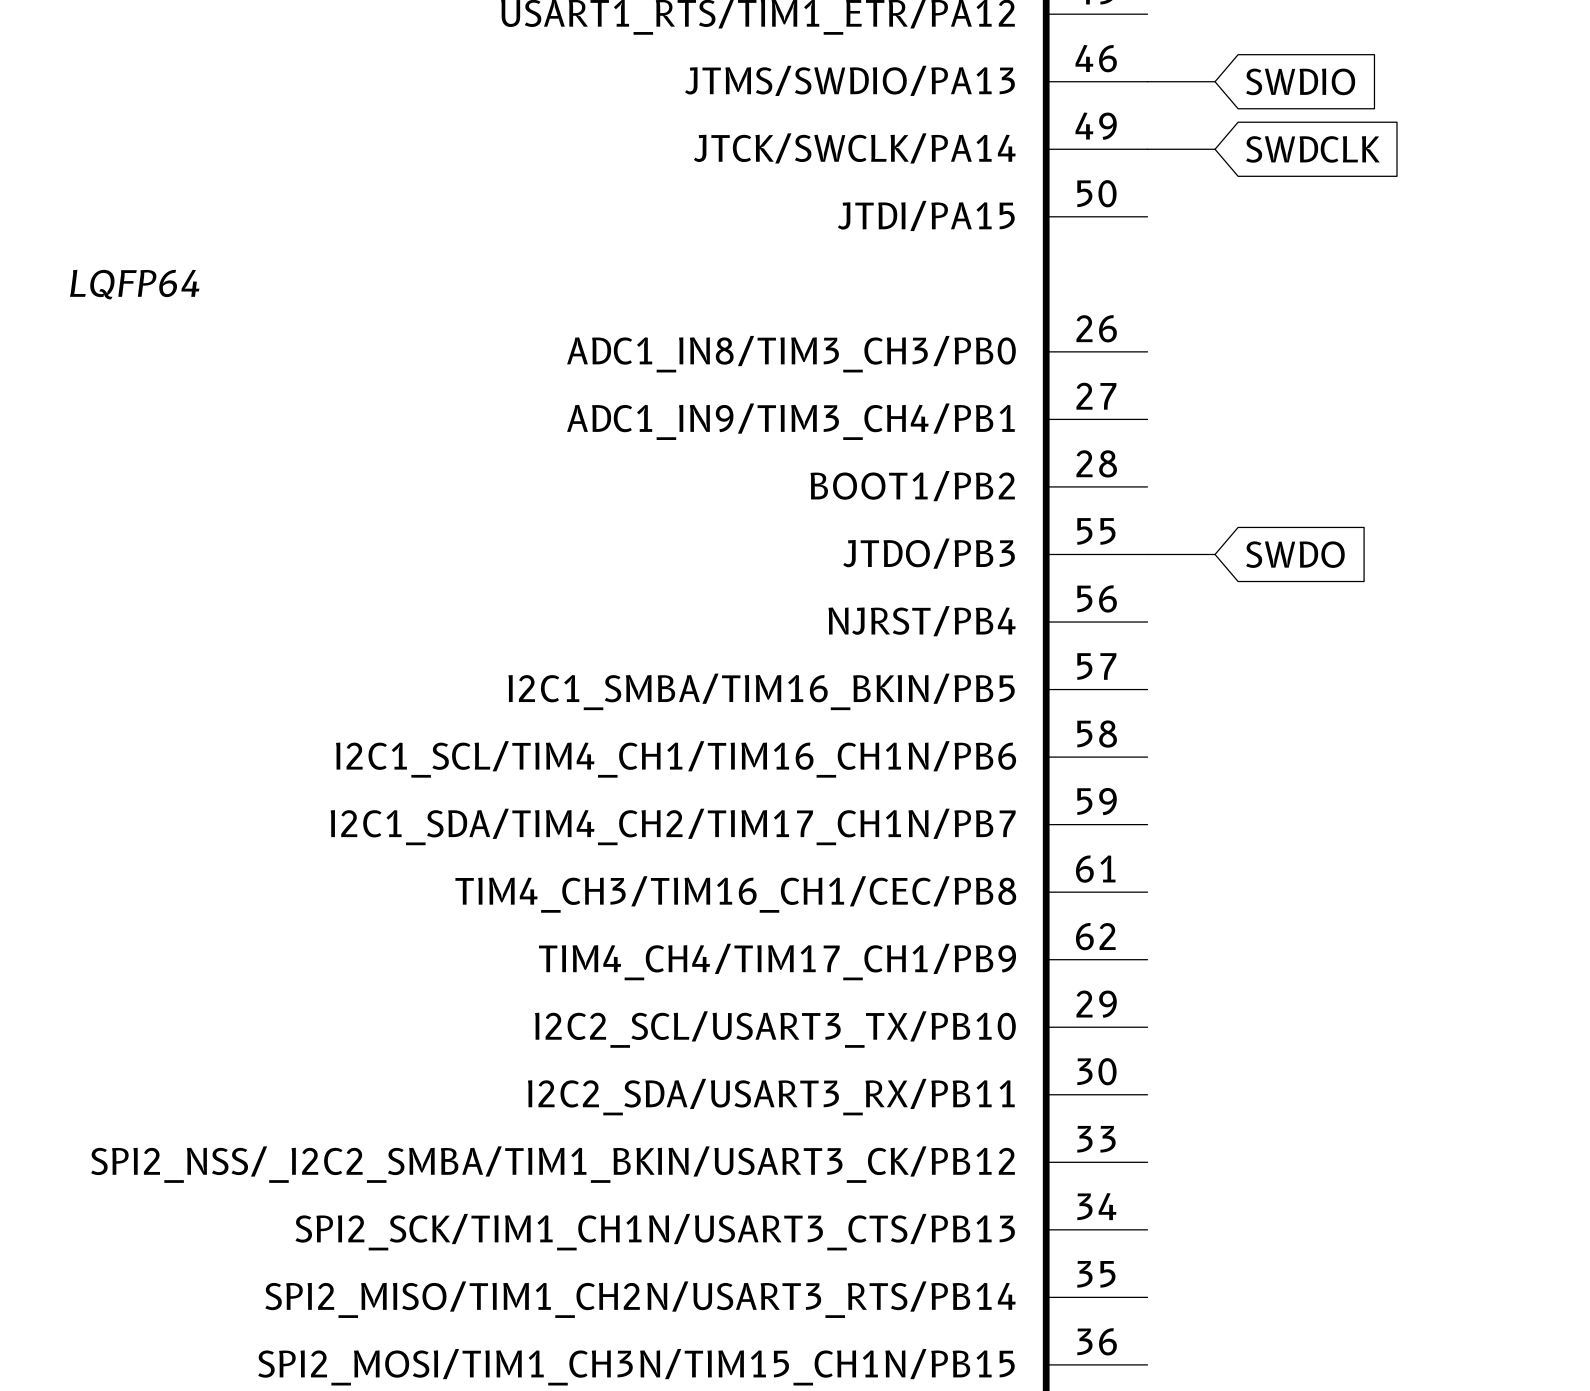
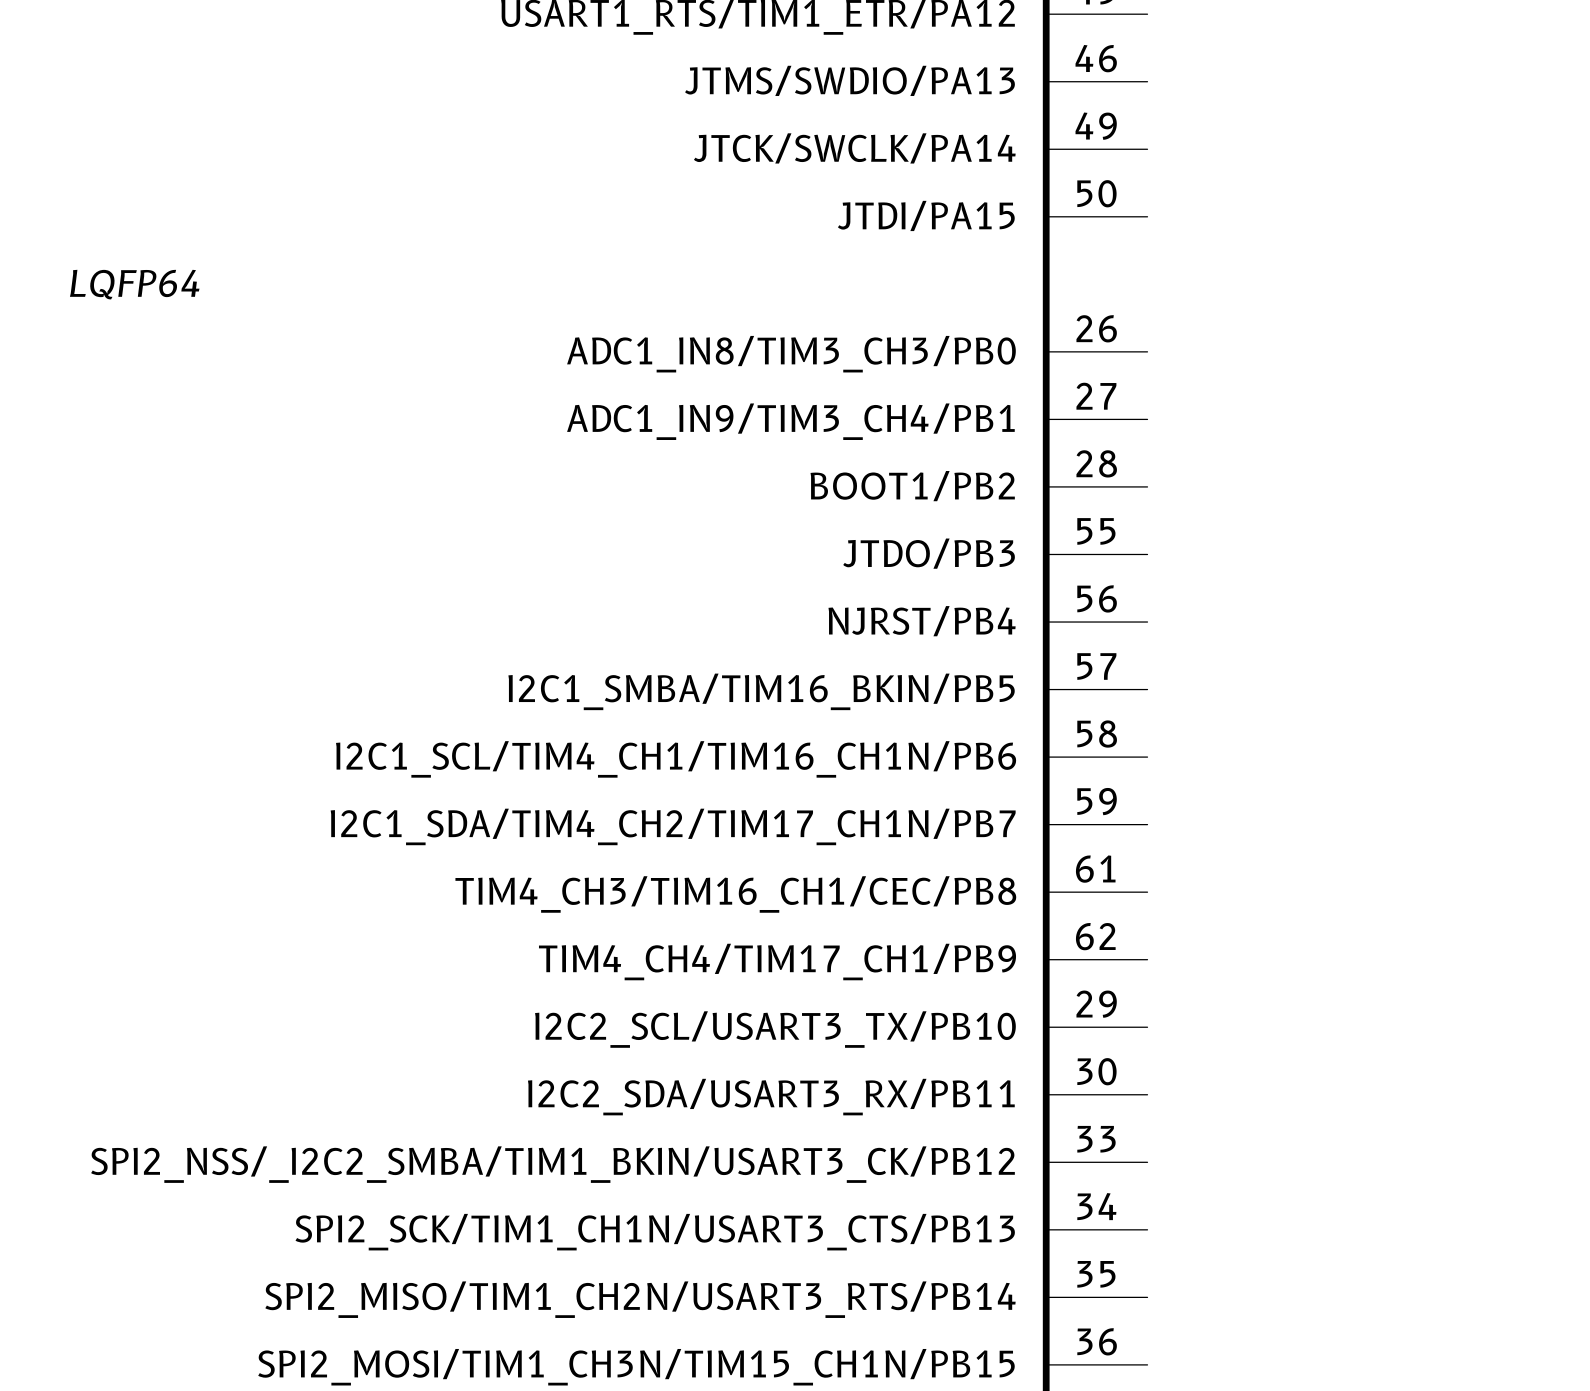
wire: (1147, 81) (1215, 81) -> none
global label: SWDIO (1300, 81) -> none
wire: (1147, 149) (1215, 149) -> none
global label: SWDCLK (1312, 149) -> none
wire: (1147, 554) (1215, 554) -> none
global label: SWDO (1295, 554) -> none

